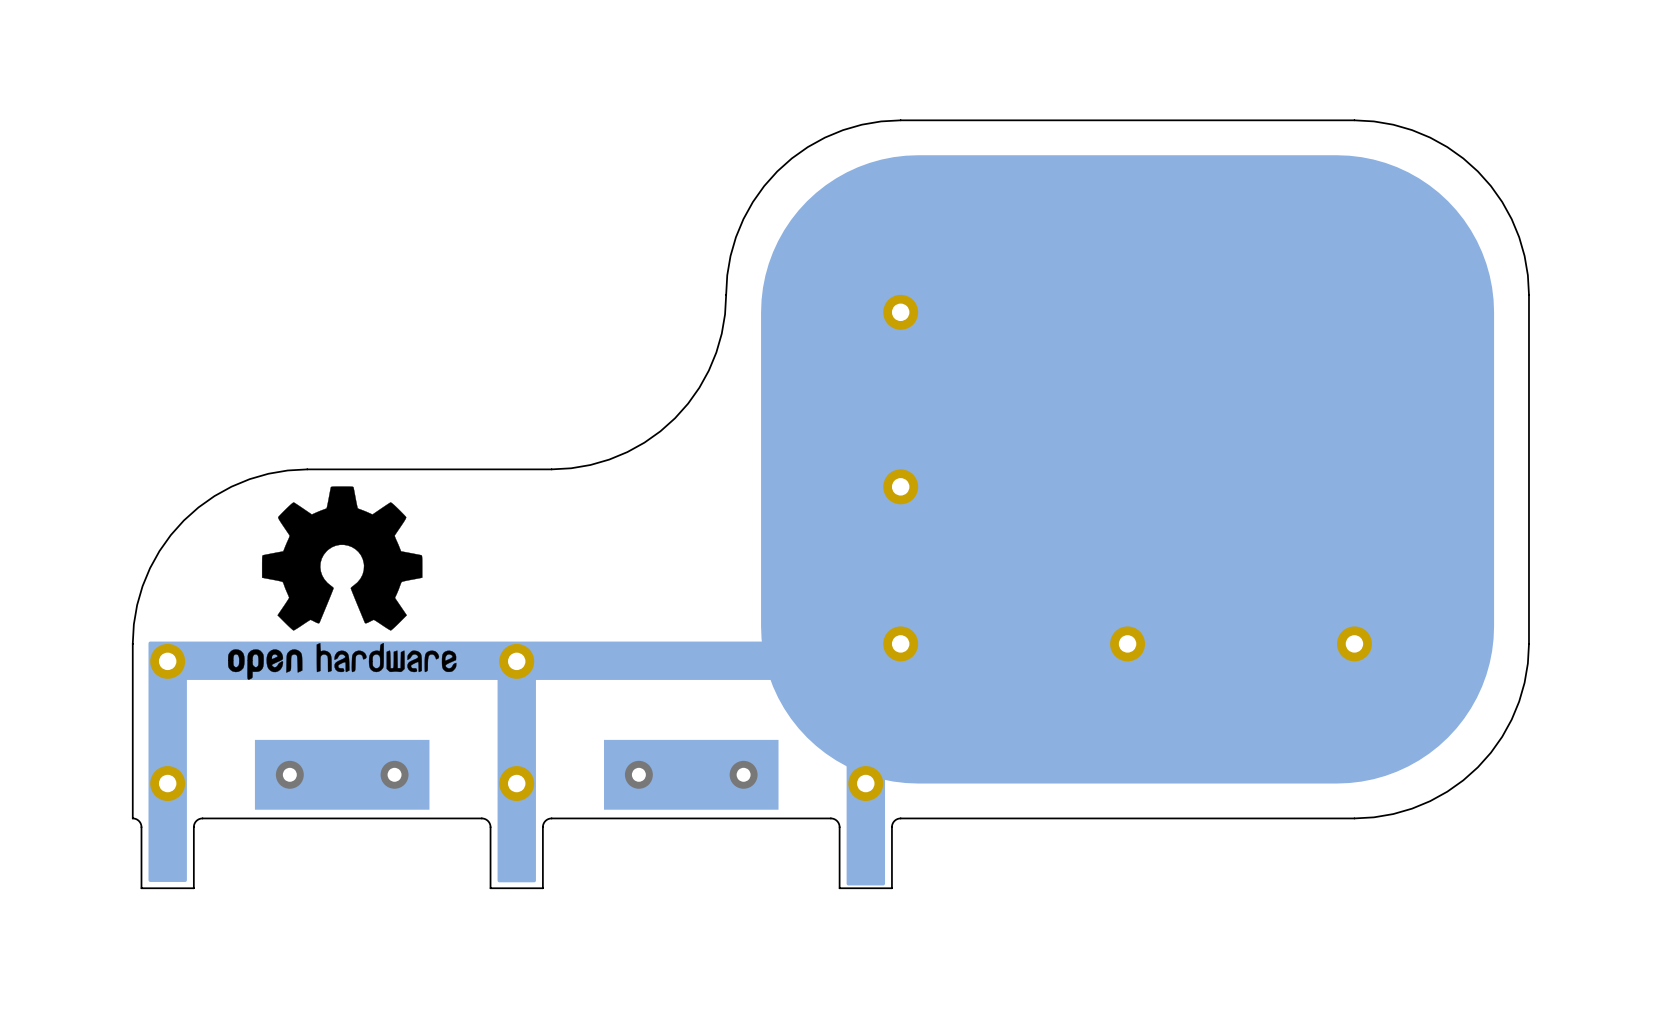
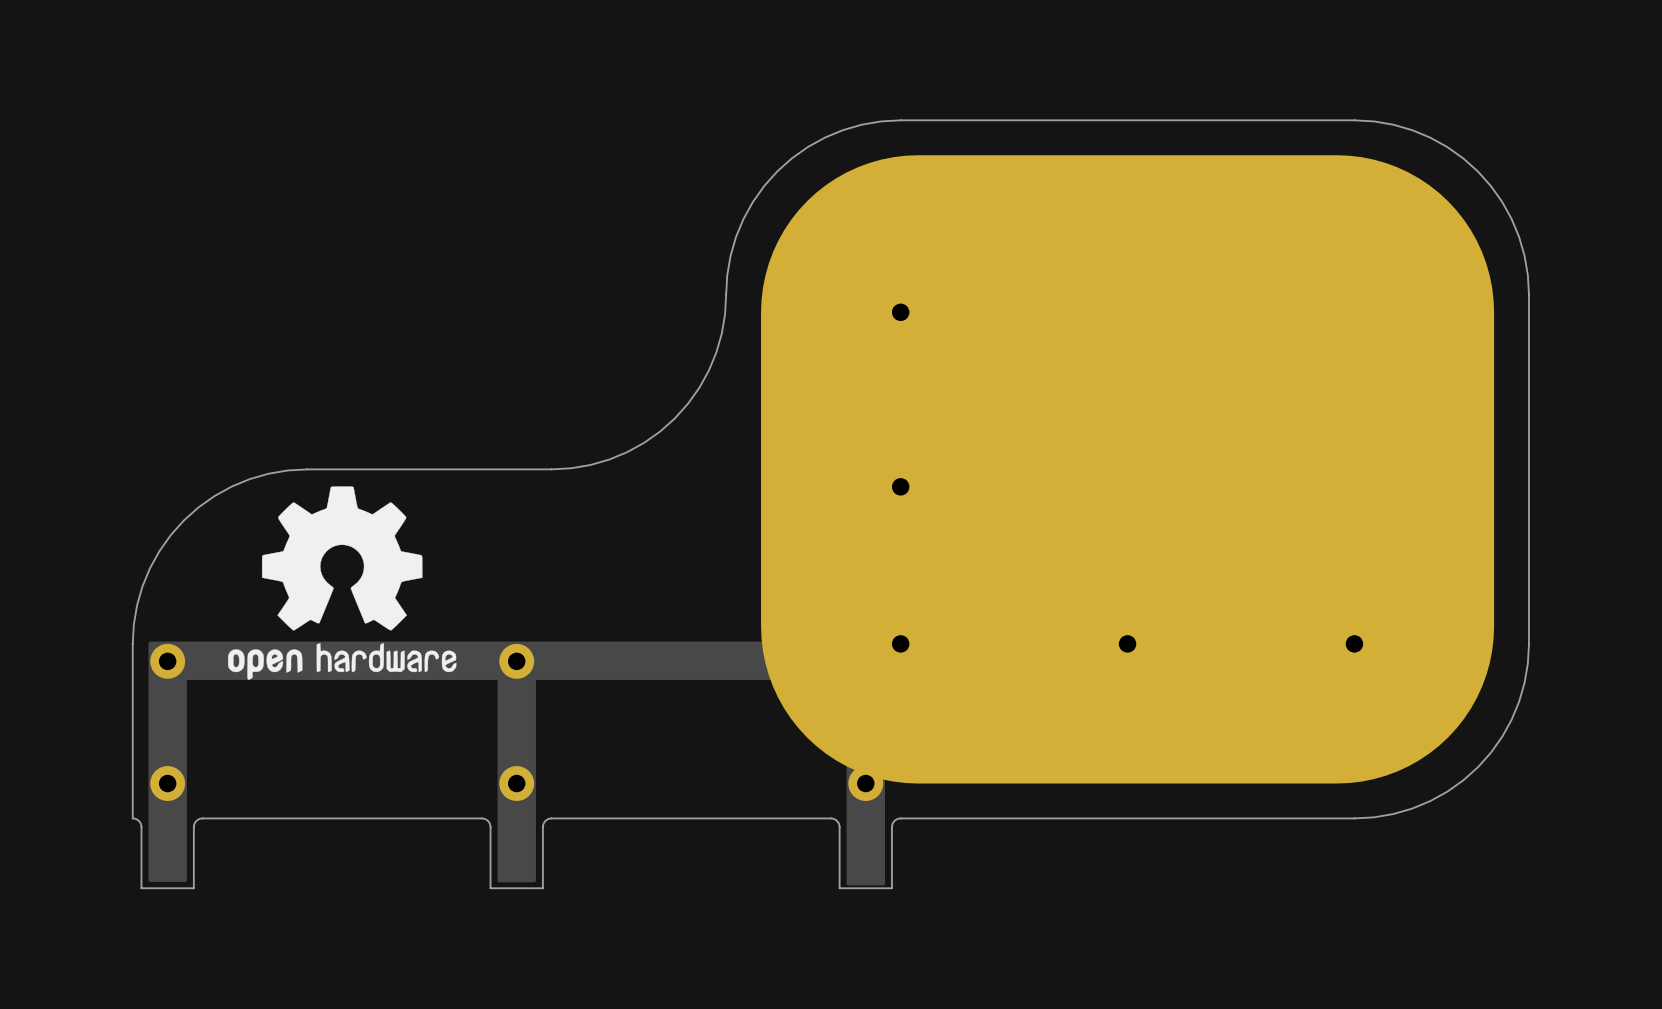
part footprint: [131, 119, 1530, 890] -> [131, 119, 1530, 890]
via: (289, 774) -> none
via: (394, 774) -> none
via: (638, 774) -> none
via: (743, 774) -> none

